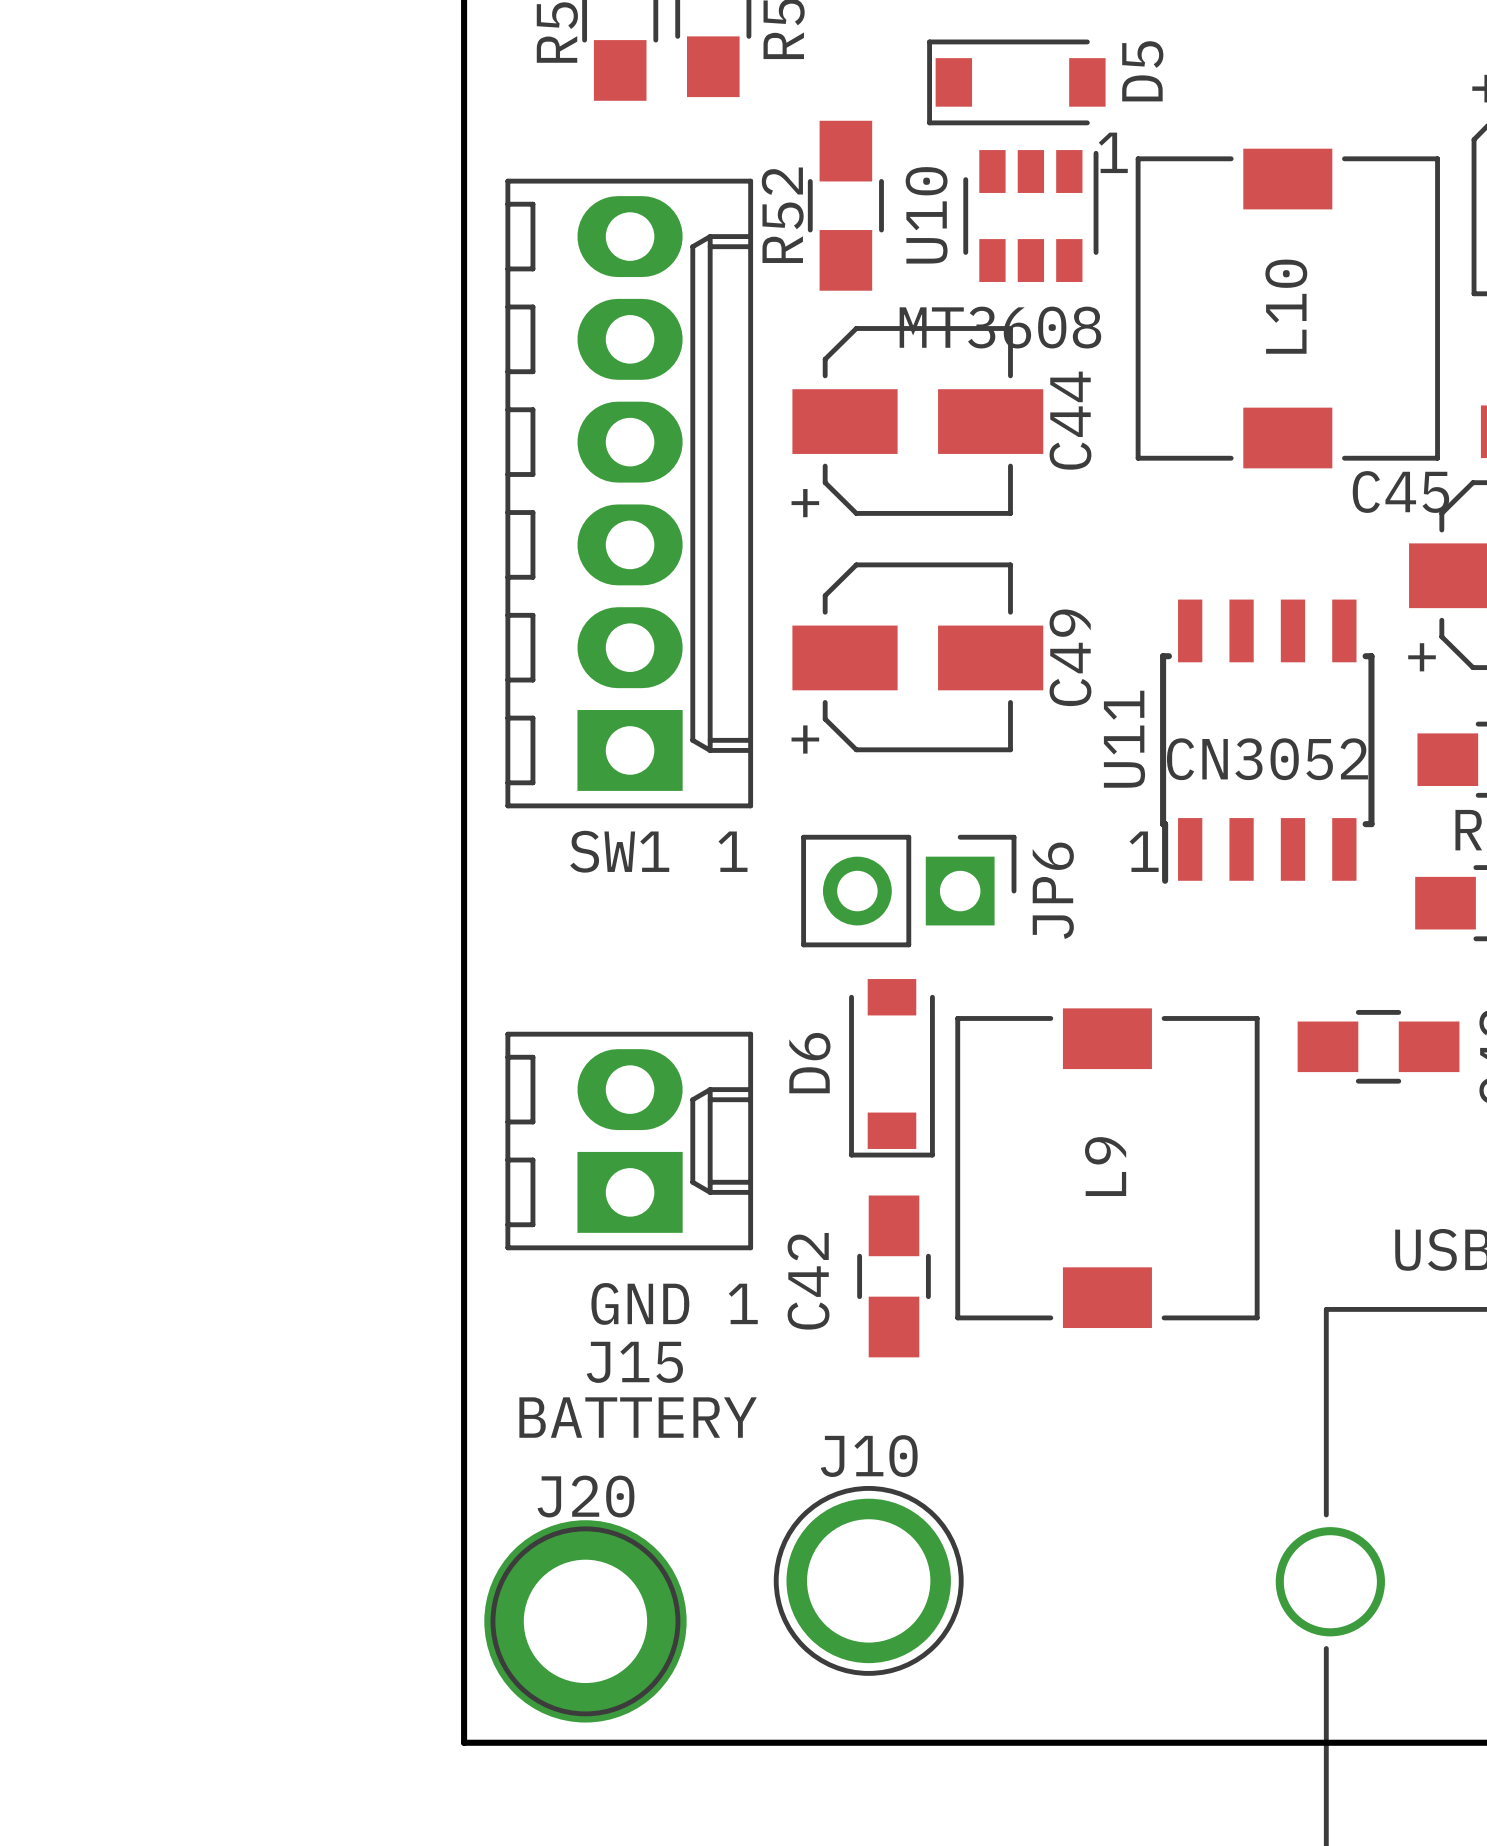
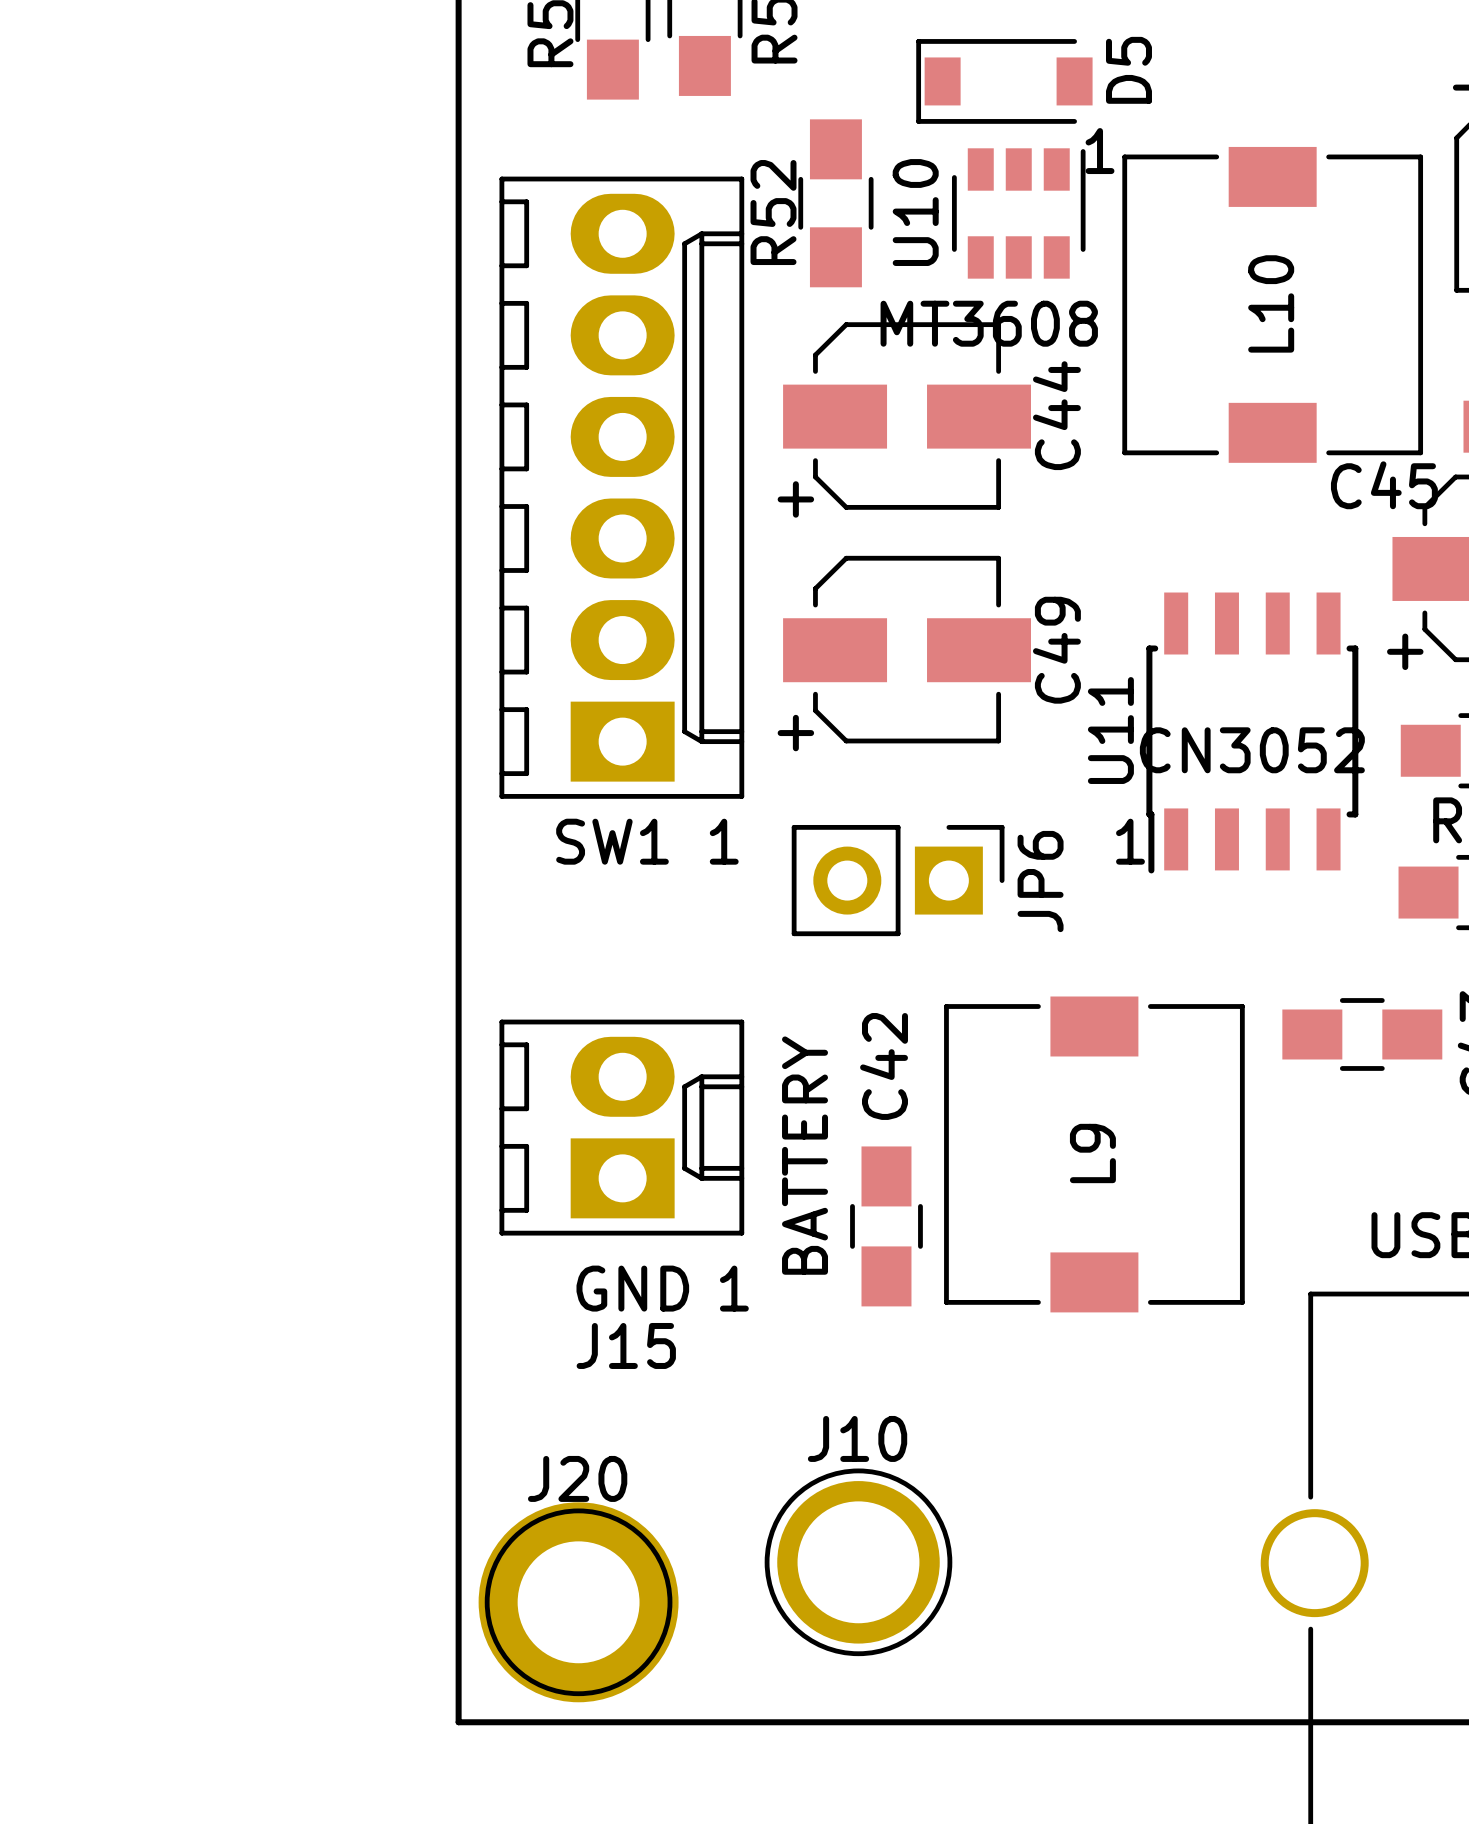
D6: (891, 1068) -> none
C42 position: (894, 1276) -> (886, 1226)
C42 name position: C42 (808, 1281) -> C42 (884, 1066)
text rotation: 0° (638, 1417) -> 90° counterclockwise (805, 1155)
text position: BATTERY (638, 1417) -> BATTERY (805, 1155)

